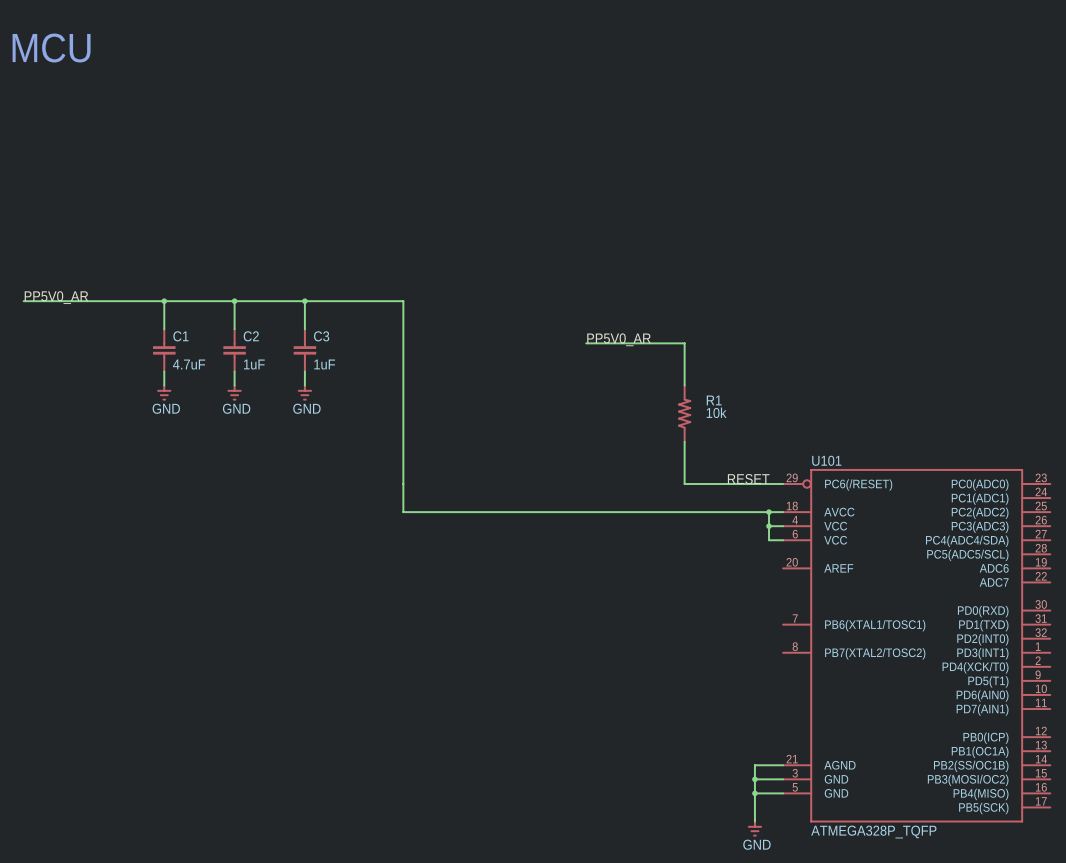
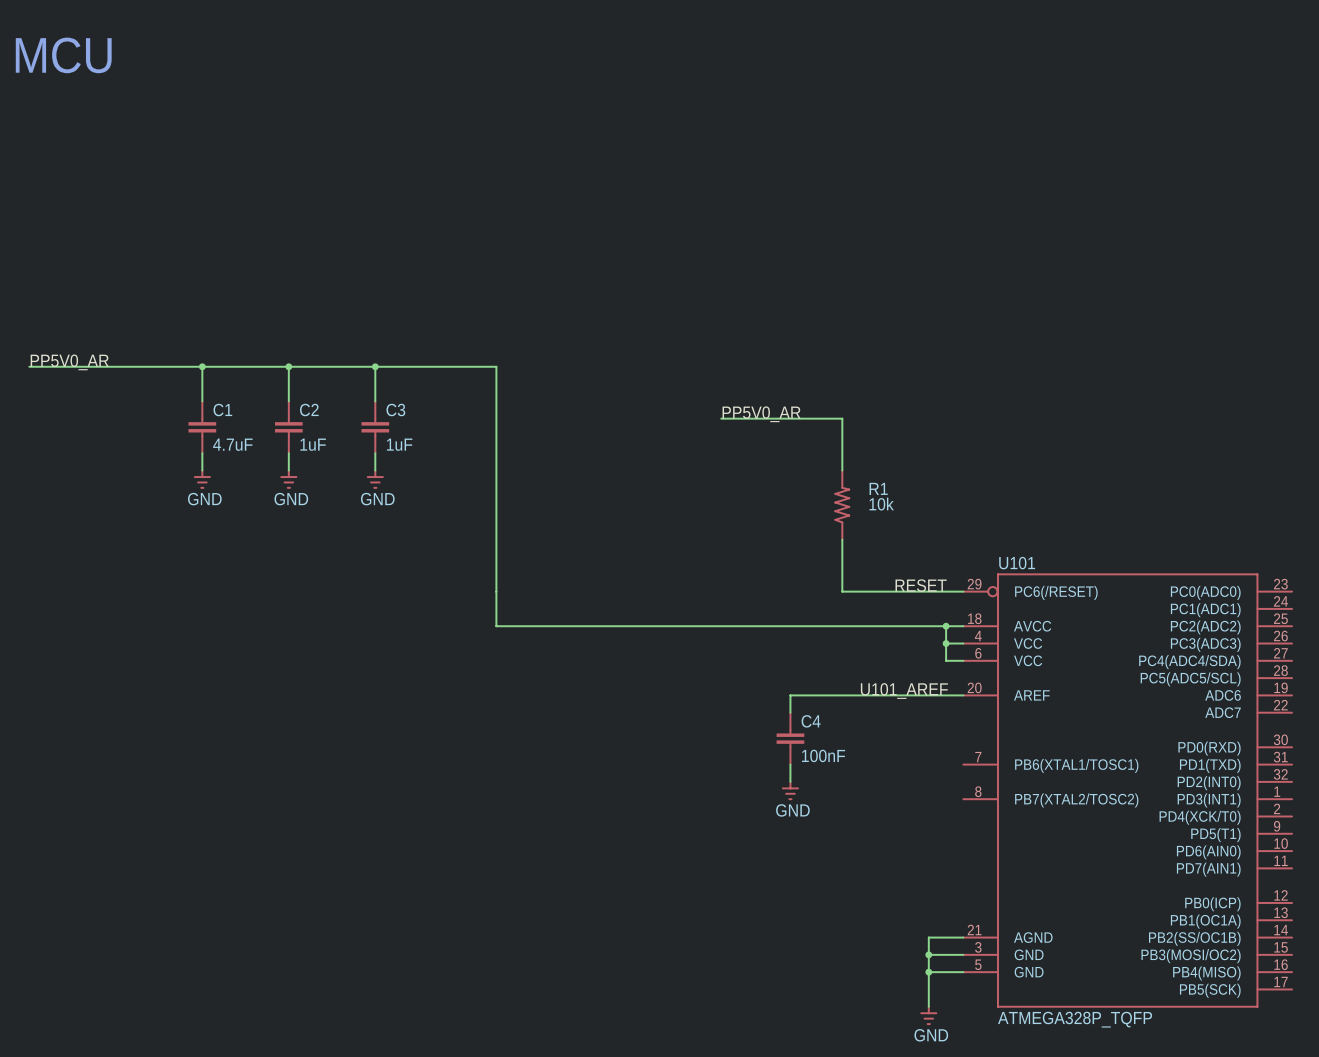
label: none -> U101_AREF (904, 691)
wire: none -> (963, 695) (790, 695) (790, 712)
C4: none -> 100nF (790, 738)
wire: none -> (790, 764) (790, 781)
power symbol: none -> GND (790, 790)

